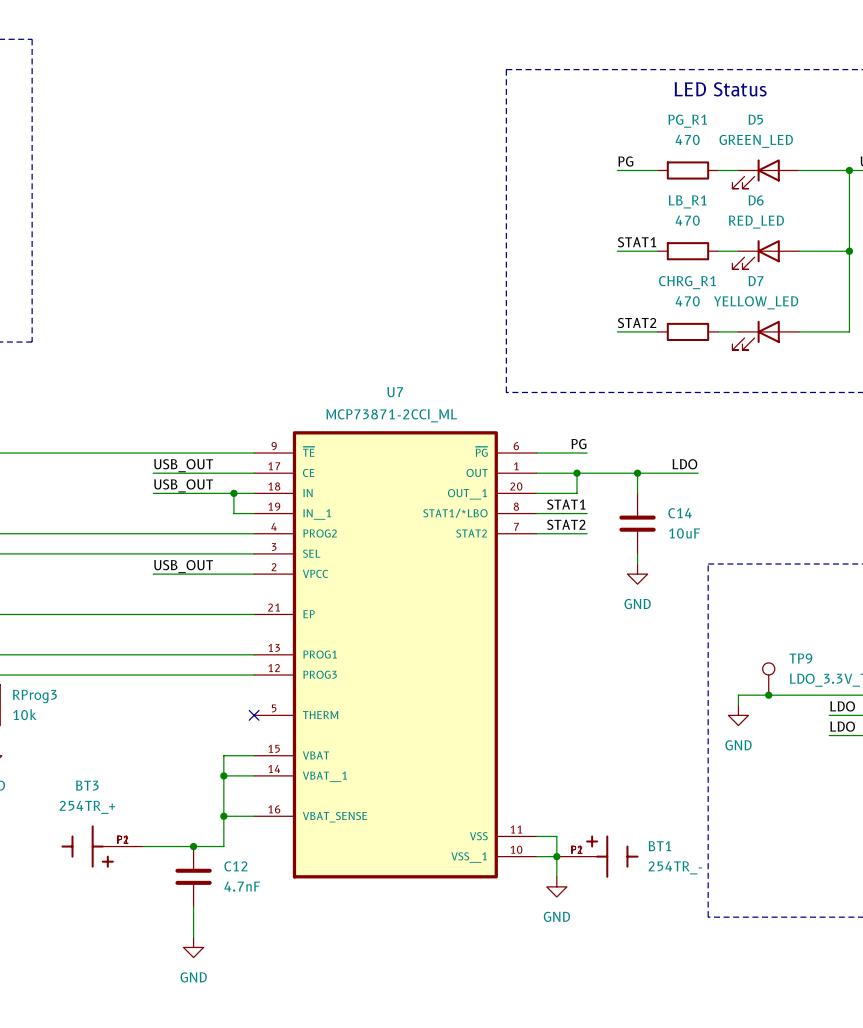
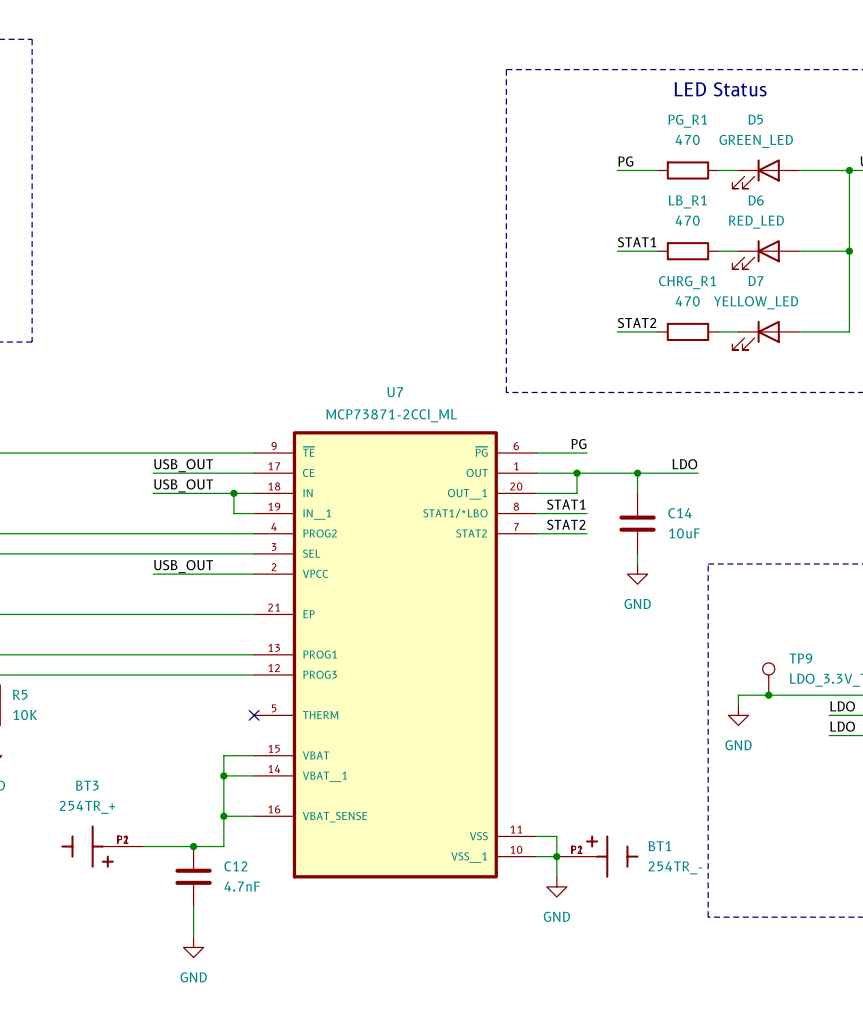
RProg3 name: RProg3 (34, 696) -> R5 (20, 694)
RProg3 value: 10k (24, 714) -> 10K (25, 715)

